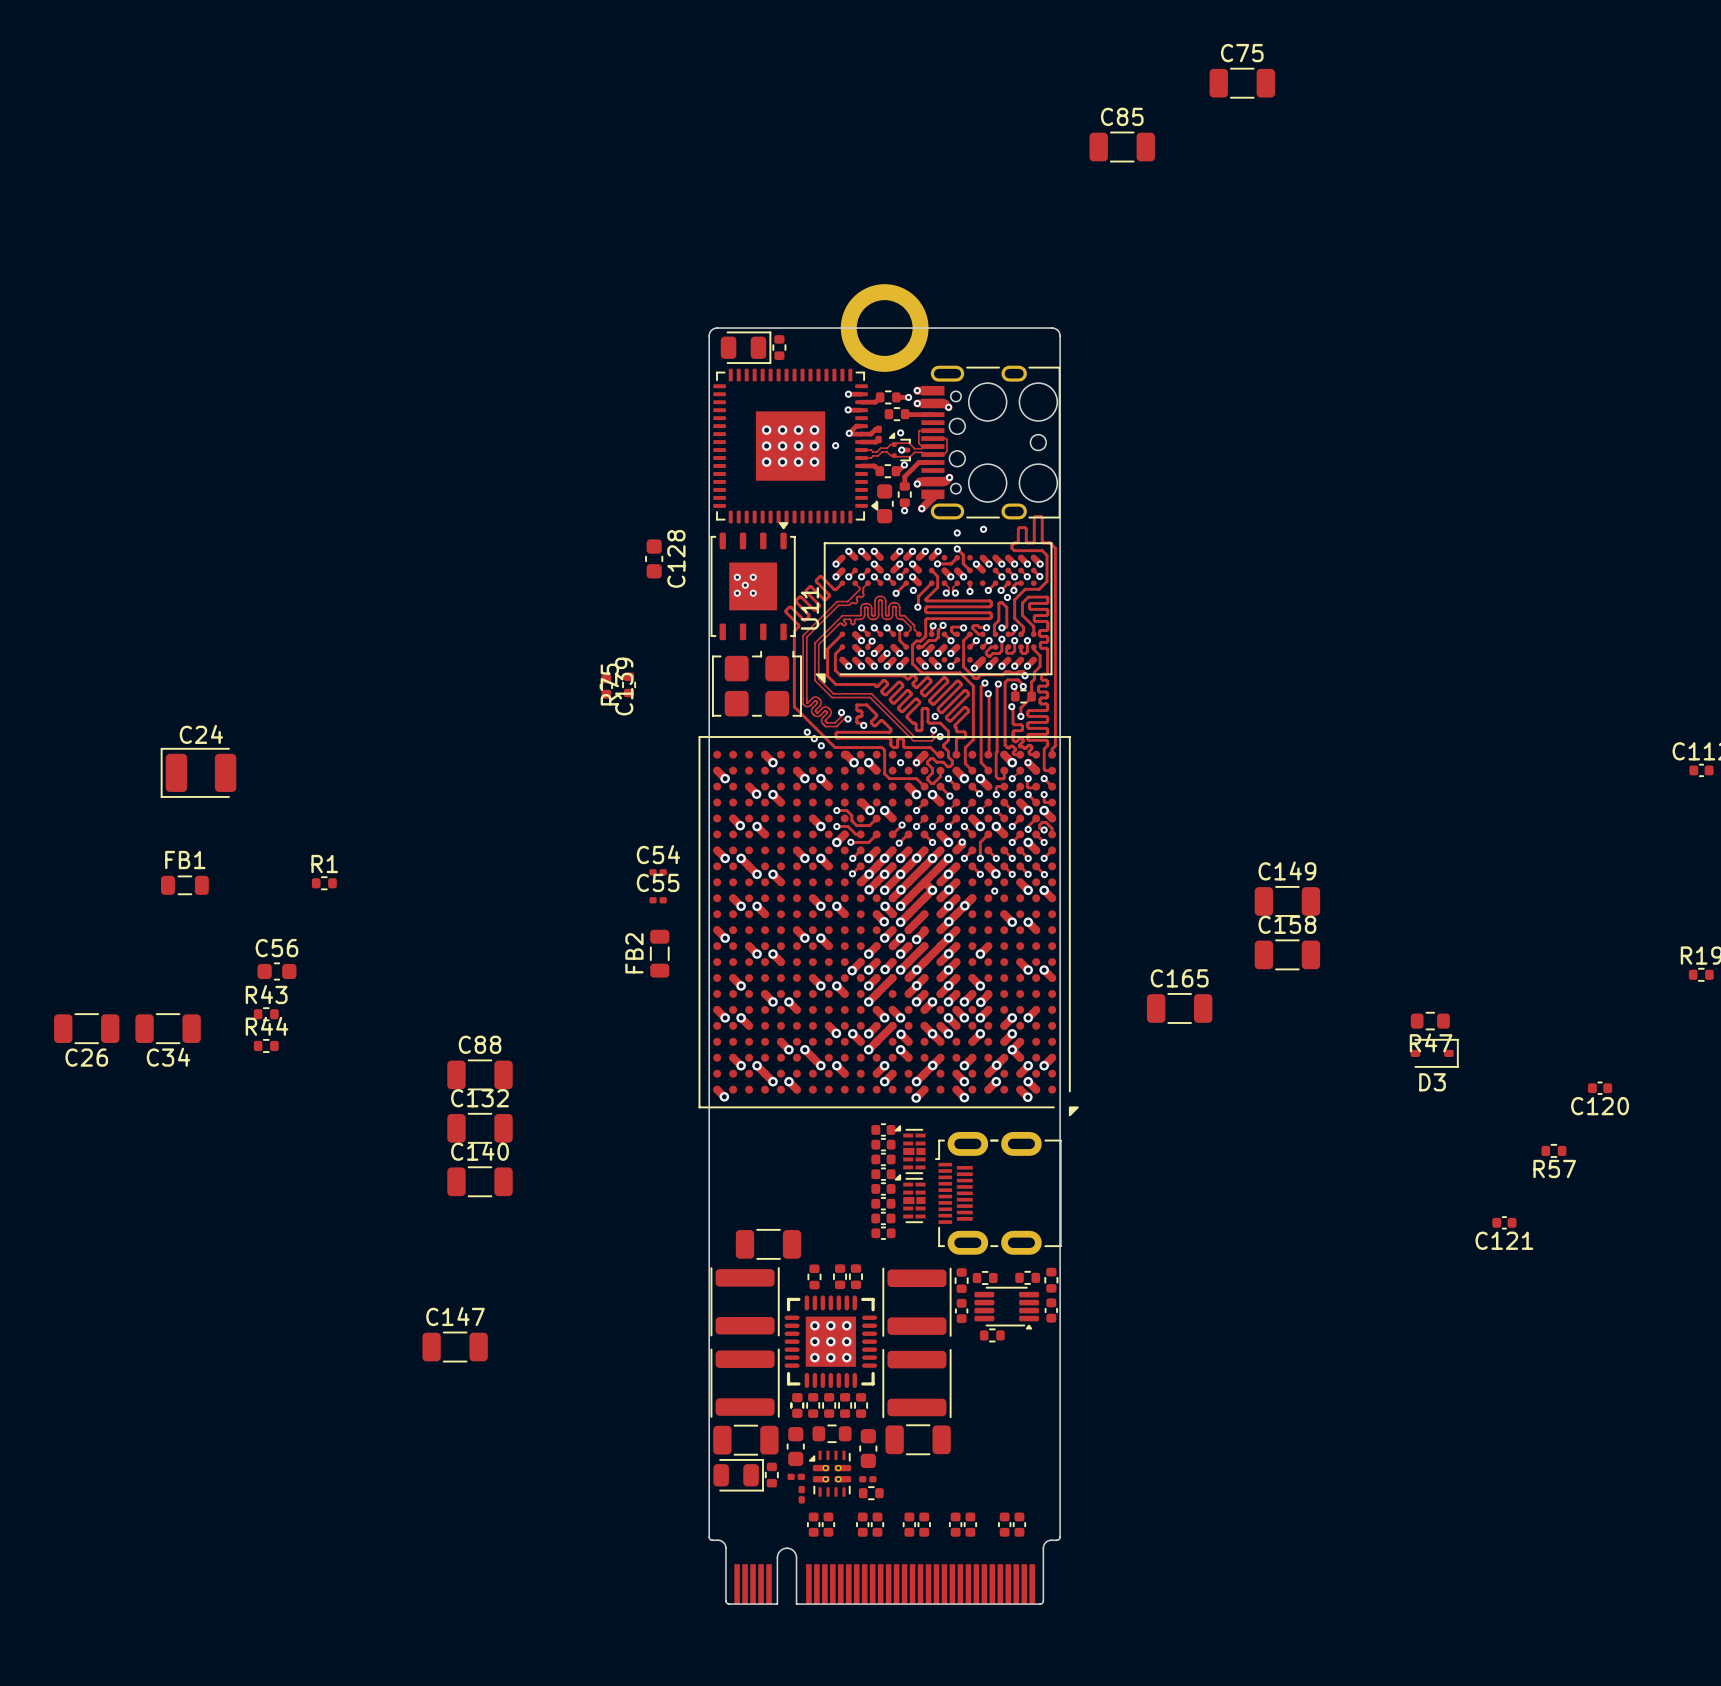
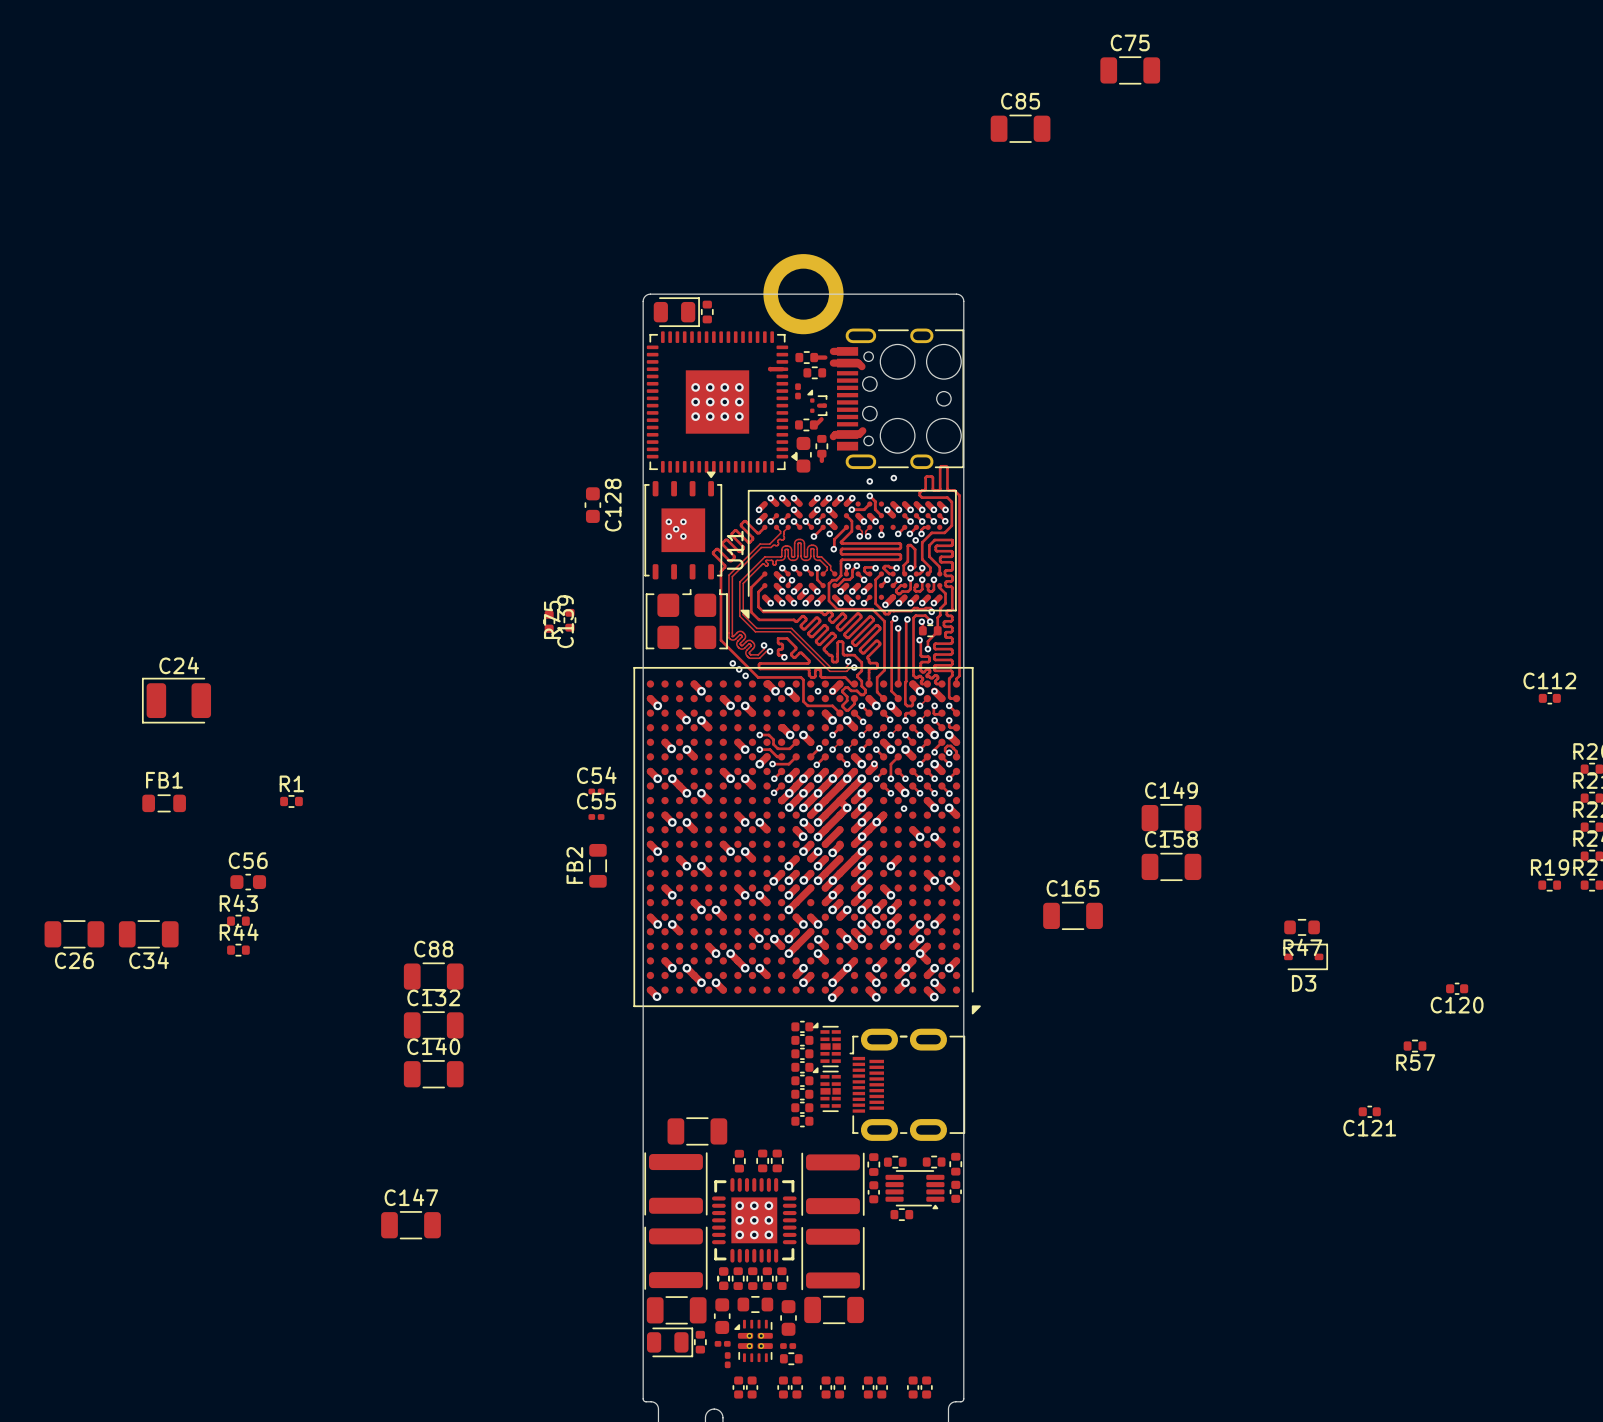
via: (917, 390) -> none
track: (848, 394) (861, 394) -> none
via: (848, 394) -> none
track: (880, 397) (875, 402) (861, 402) -> none
via: (908, 397) -> none
via: (917, 403) -> none
via: (948, 407) -> none
via: (848, 409) -> none
track: (905, 414) (932, 414) -> none
track: (861, 426) (856, 426) (849, 433) (870, 434) (875, 429) (878, 429) -> none
track: (932, 430) (918, 431) (918, 443) (922, 446) (932, 446) -> none
via: (900, 432) -> none
via: (849, 433) -> none
track: (932, 438) (946, 439) (946, 451) (943, 454) (914, 452) (910, 456) (895, 456) (886, 451) (882, 451) (878, 455) (871, 458) (861, 458) -> none
track: (878, 439) (876, 442) (861, 442) -> none
via: (835, 445) -> none
track: (923, 446) (921, 448) (914, 448) (909, 443) (895, 443) (886, 448) (880, 448) (876, 452) (861, 450) -> none
via: (901, 450) -> none
track: (932, 462) (918, 462) (904, 476) (904, 486) -> none
via: (904, 464) -> none
track: (861, 466) (874, 466) (879, 471) -> none
via: (949, 477) -> none
via: (917, 483) -> none
track: (932, 494) (932, 497) (921, 508) -> none
via: (921, 508) -> none
via: (904, 510) -> none

